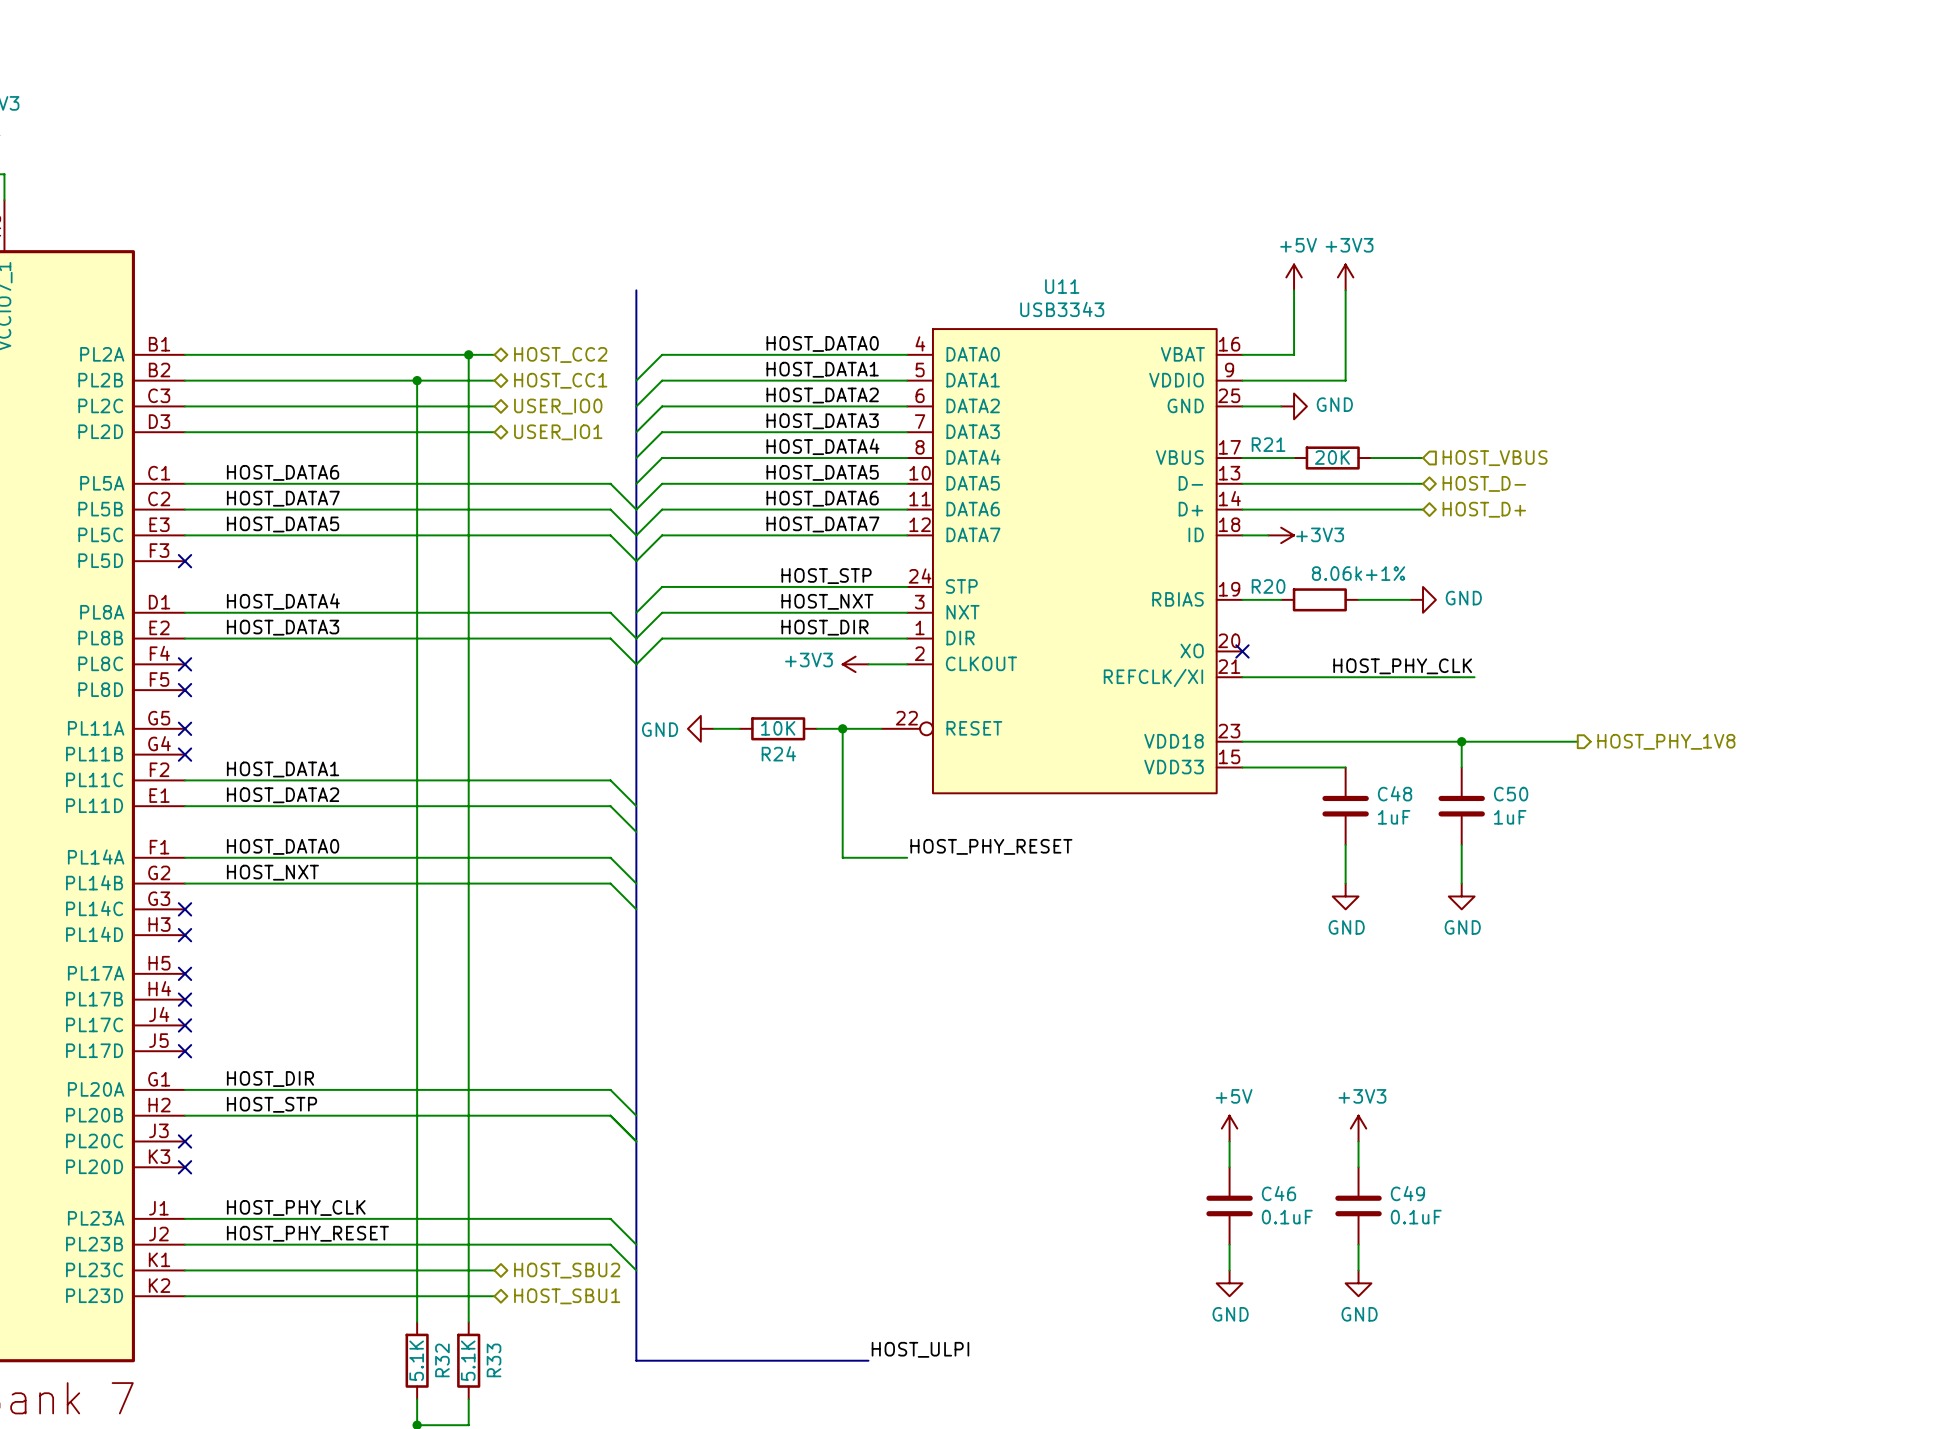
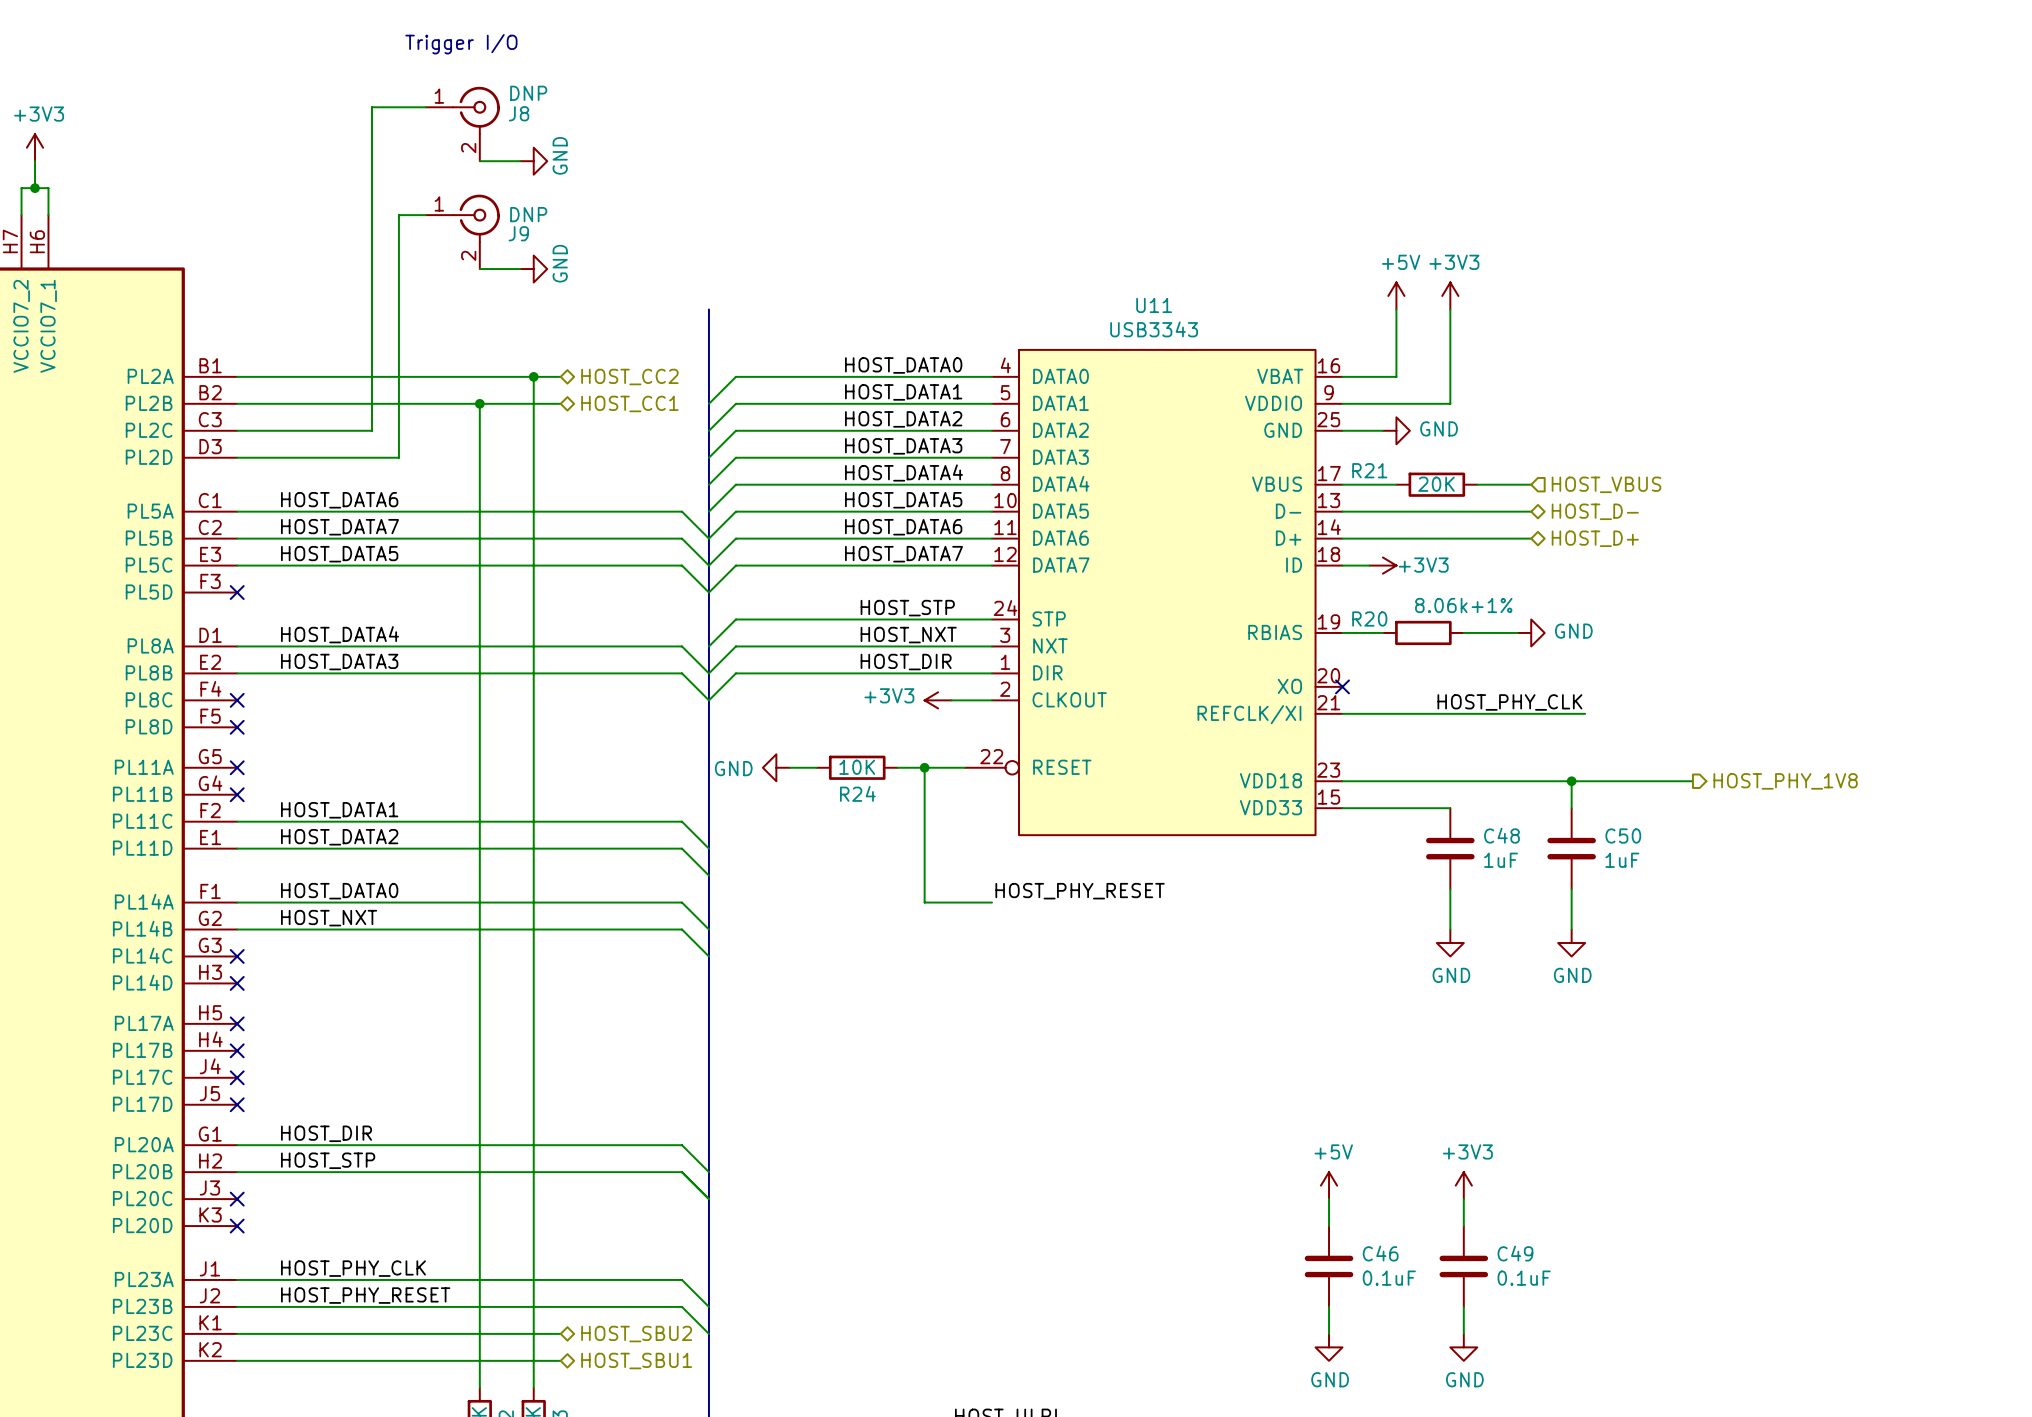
text: none -> Trigger I/O (461, 44)
J8: none -> (462, 123)
wire: none -> (479, 161) (520, 161)
power symbol: none -> GND (533, 161)
J9: none -> (462, 231)
wire: none -> (479, 269) (520, 269)
power symbol: none -> GND (533, 269)
wire: (313, 406) (494, 406) -> (371, 430) (371, 107) (425, 107)
hierarchical label: USER_IO0 (558, 406) -> none
wire: (339, 432) (494, 432) -> (398, 457) (398, 215) (425, 215)
hierarchical label: USER_IO1 (558, 432) -> none

